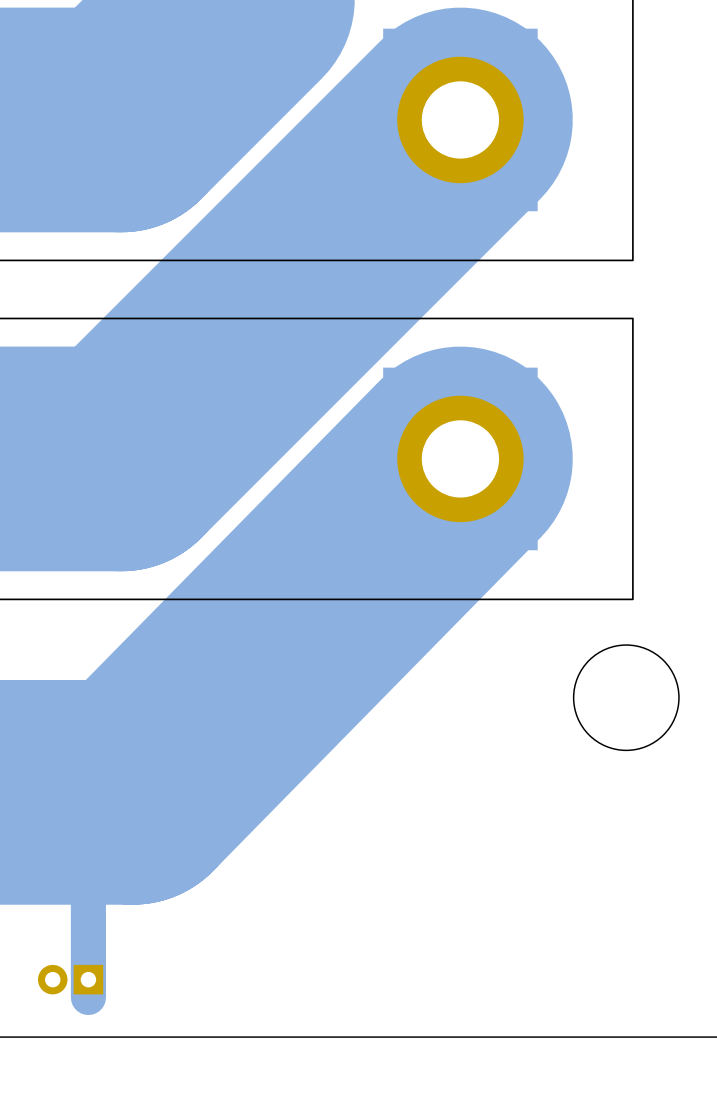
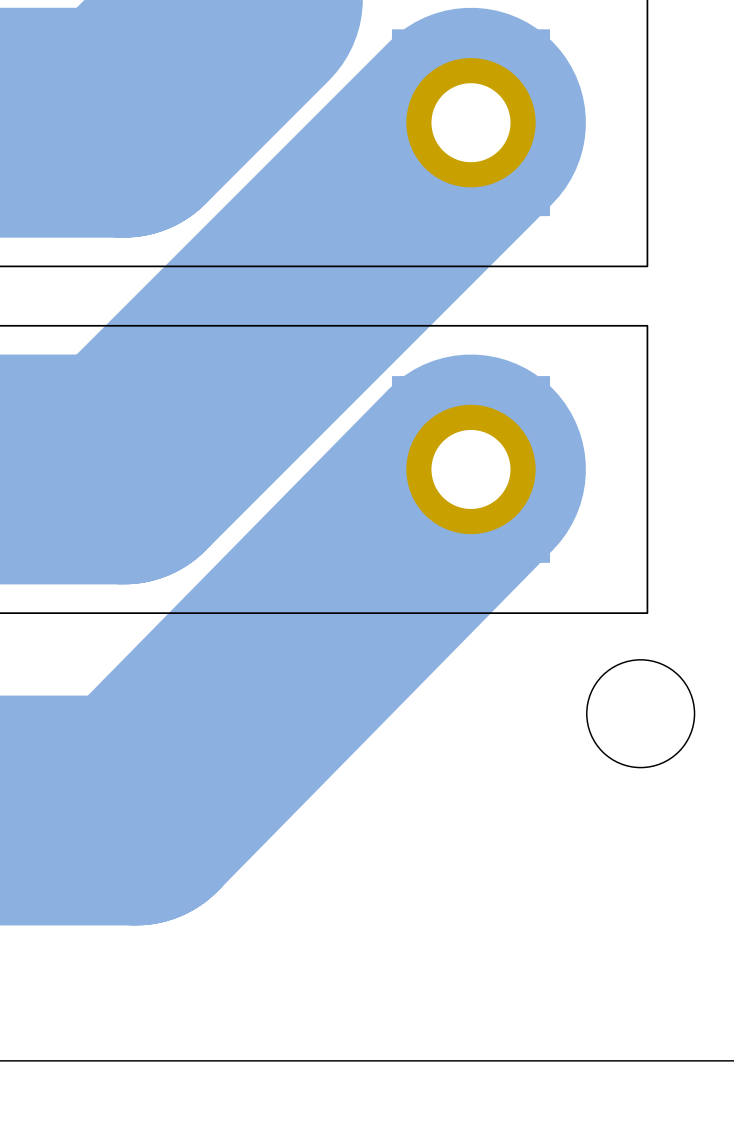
track: (88, 836) (88, 997) -> none
part: (70, 979) -> none

